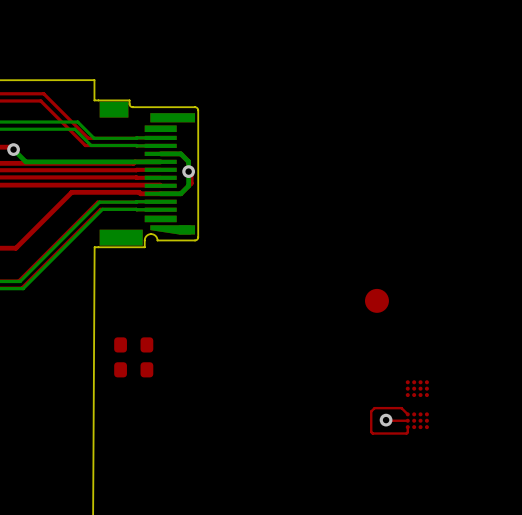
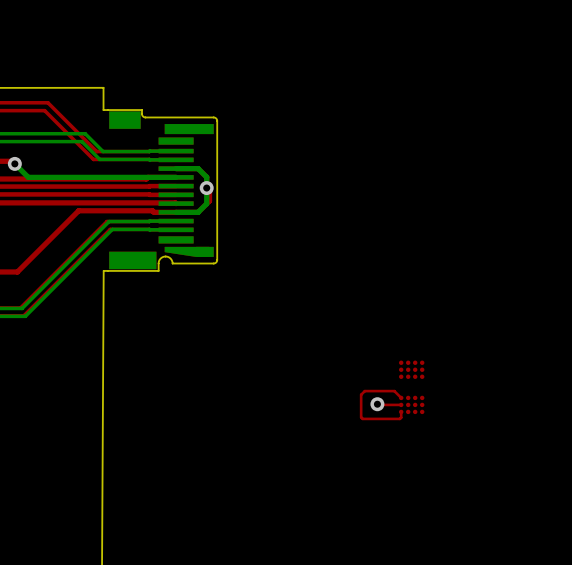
part: (376, 300) -> none
part: none -> (411, 369)
part: (133, 344) -> none
part: (133, 369) -> none
part: none -> (411, 404)
part: (417, 388) -> none
top track: (407, 414) (401, 408) (374, 408) (371, 411) (371, 432) (406, 433) (407, 427) -> (401, 397) (394, 391) (364, 391) (361, 394) (361, 417) (362, 418) (399, 418) (401, 411)
top track: (386, 420) (407, 420) -> (377, 404) (401, 404)
via position: (386, 420) -> (377, 404)
part: (417, 420) -> none

